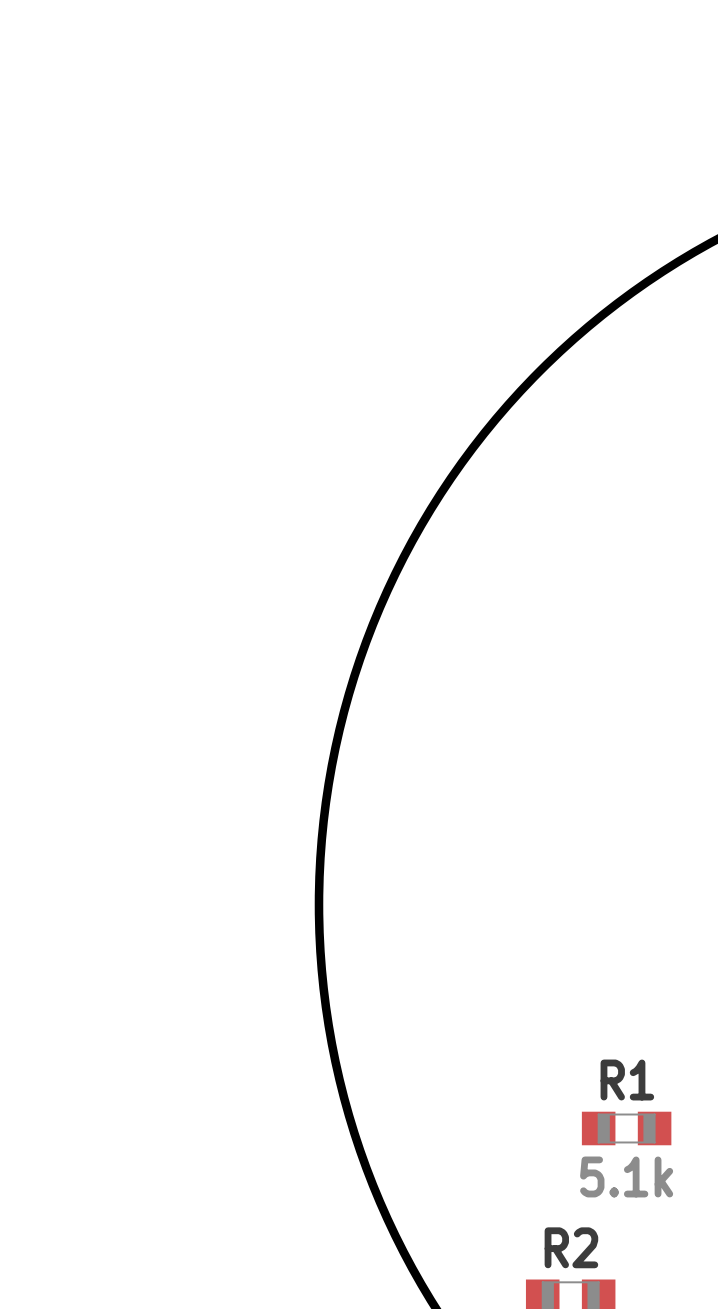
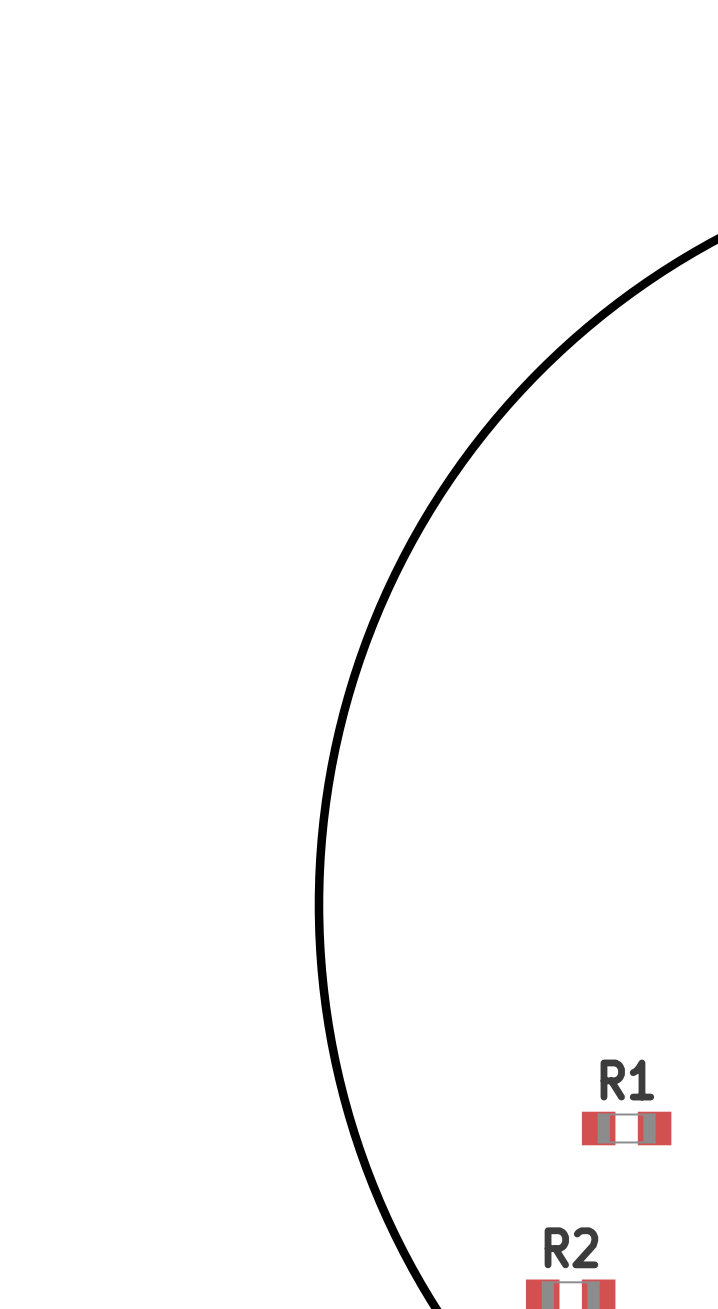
R1 value: 5.1k (626, 1176) -> none

